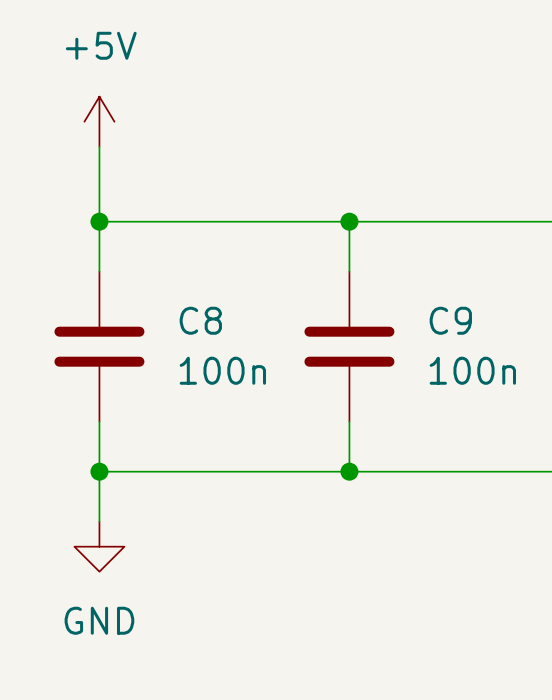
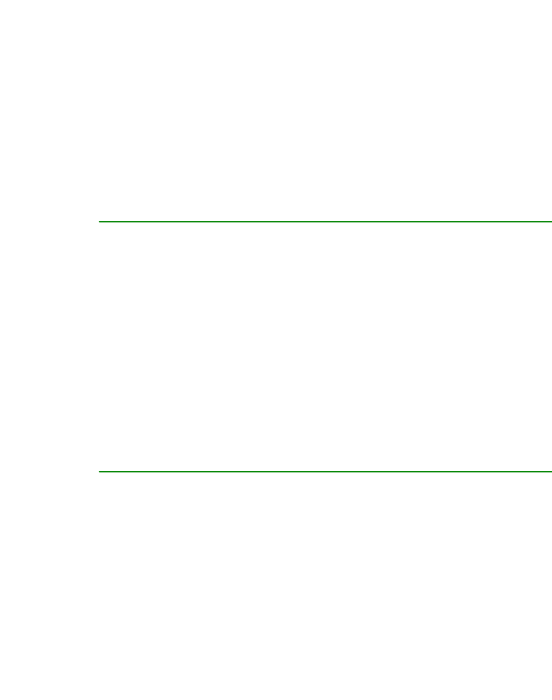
power symbol: +5V (99, 121) -> none
wire: (99, 146) (99, 271) -> none
junction: (99, 221) -> none
wire: (349, 221) (349, 271) -> none
junction: (349, 221) -> none
C8: 100n (99, 346) -> none
C9: 100n (349, 346) -> none
wire: (99, 421) (99, 521) -> none
wire: (349, 421) (349, 471) -> none
junction: (99, 471) -> none
junction: (349, 471) -> none
power symbol: GND (99, 546) -> none

